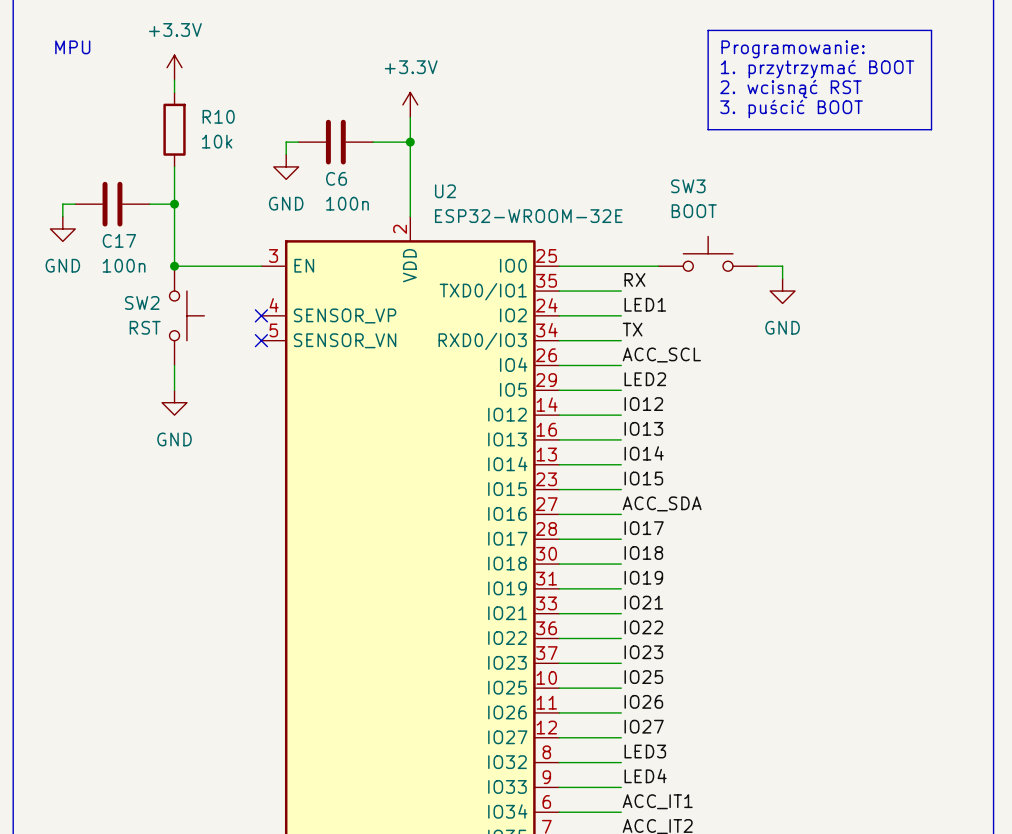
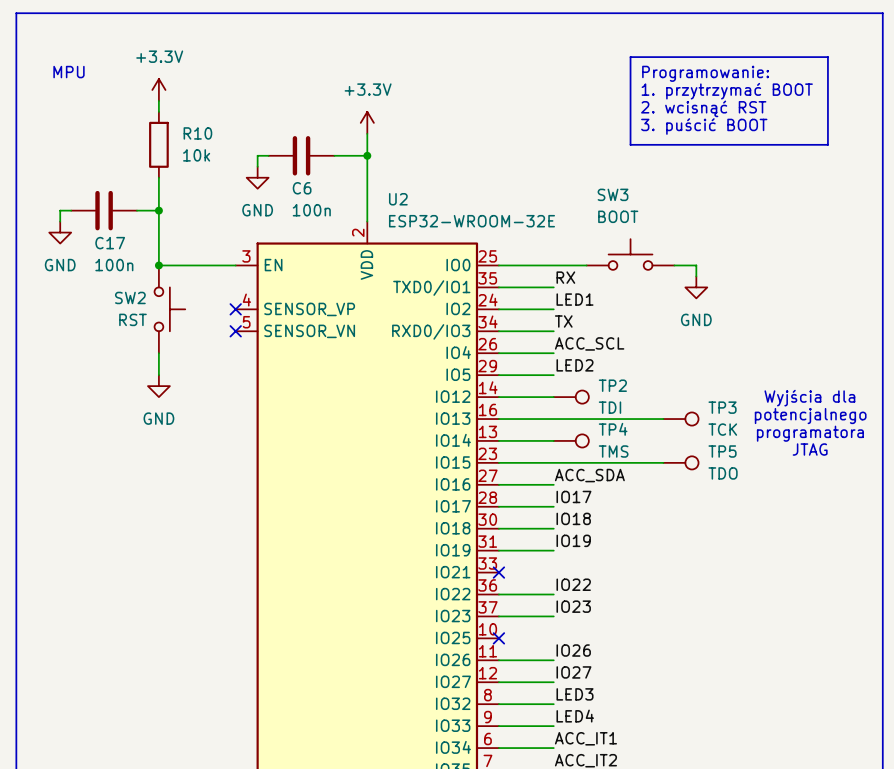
label: IO12 (643, 404) -> none
TP2: none -> TDI (571, 397)
text: none -> Wyjścia dla (809, 398)
label: IO13 (643, 428) -> none
text: none -> potencjalnego (810, 416)
wire: none -> (553, 419) (663, 419)
TP3: none -> TCK (680, 419)
label: IO14 (644, 453) -> none
text: none -> programatora (810, 433)
TP4: none -> TMS (571, 440)
text: none -> JTAG (810, 449)
label: IO15 (643, 478) -> none
wire: none -> (553, 462) (663, 462)
TP5: none -> TDO (680, 462)
label: IO21 (643, 602) -> none
wire: (559, 613) (621, 613) -> none
no-connect mark: none -> (498, 572)
label: IO25 (643, 677) -> none
wire: (559, 688) (621, 688) -> none
no-connect mark: none -> (498, 638)

